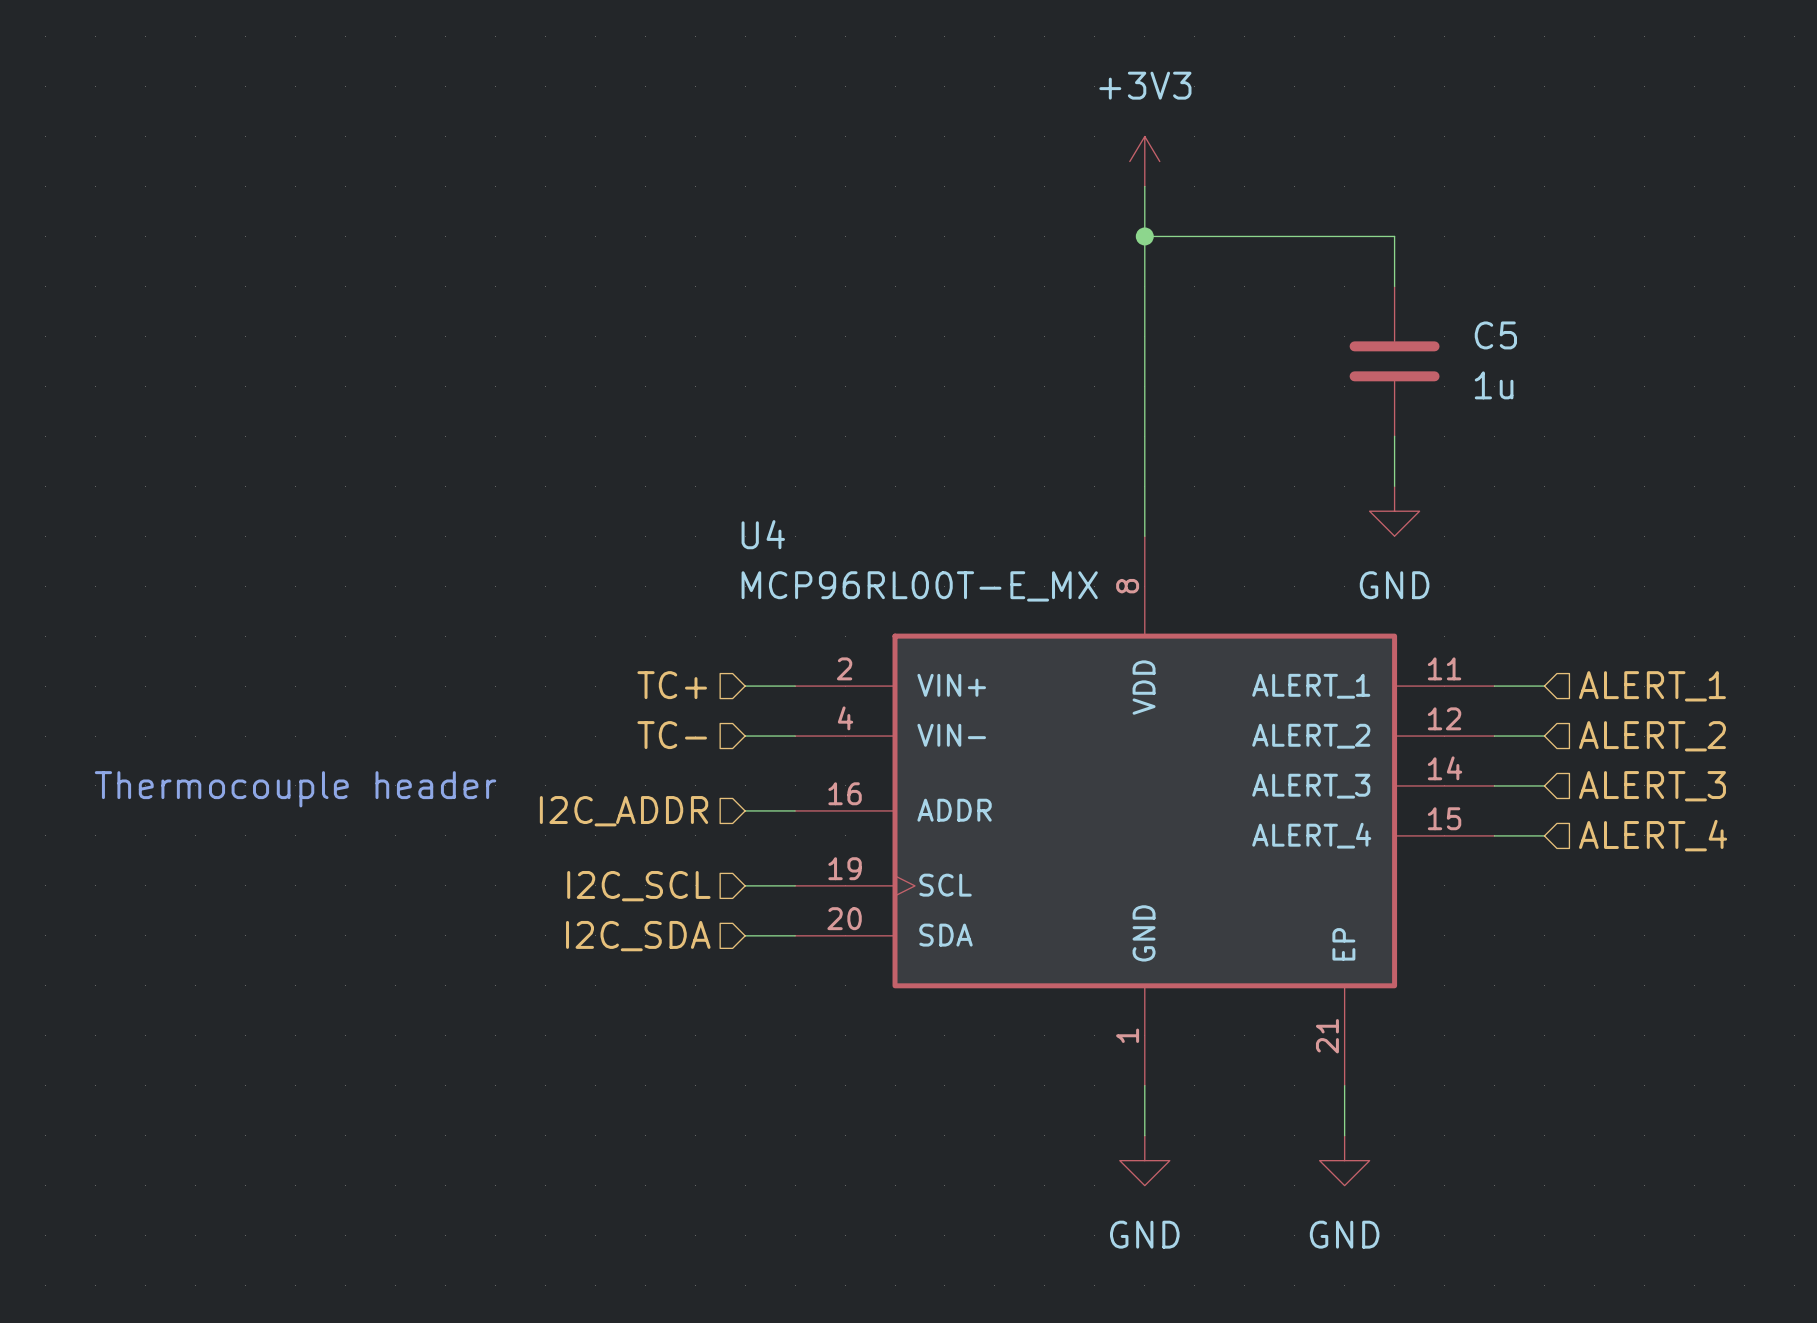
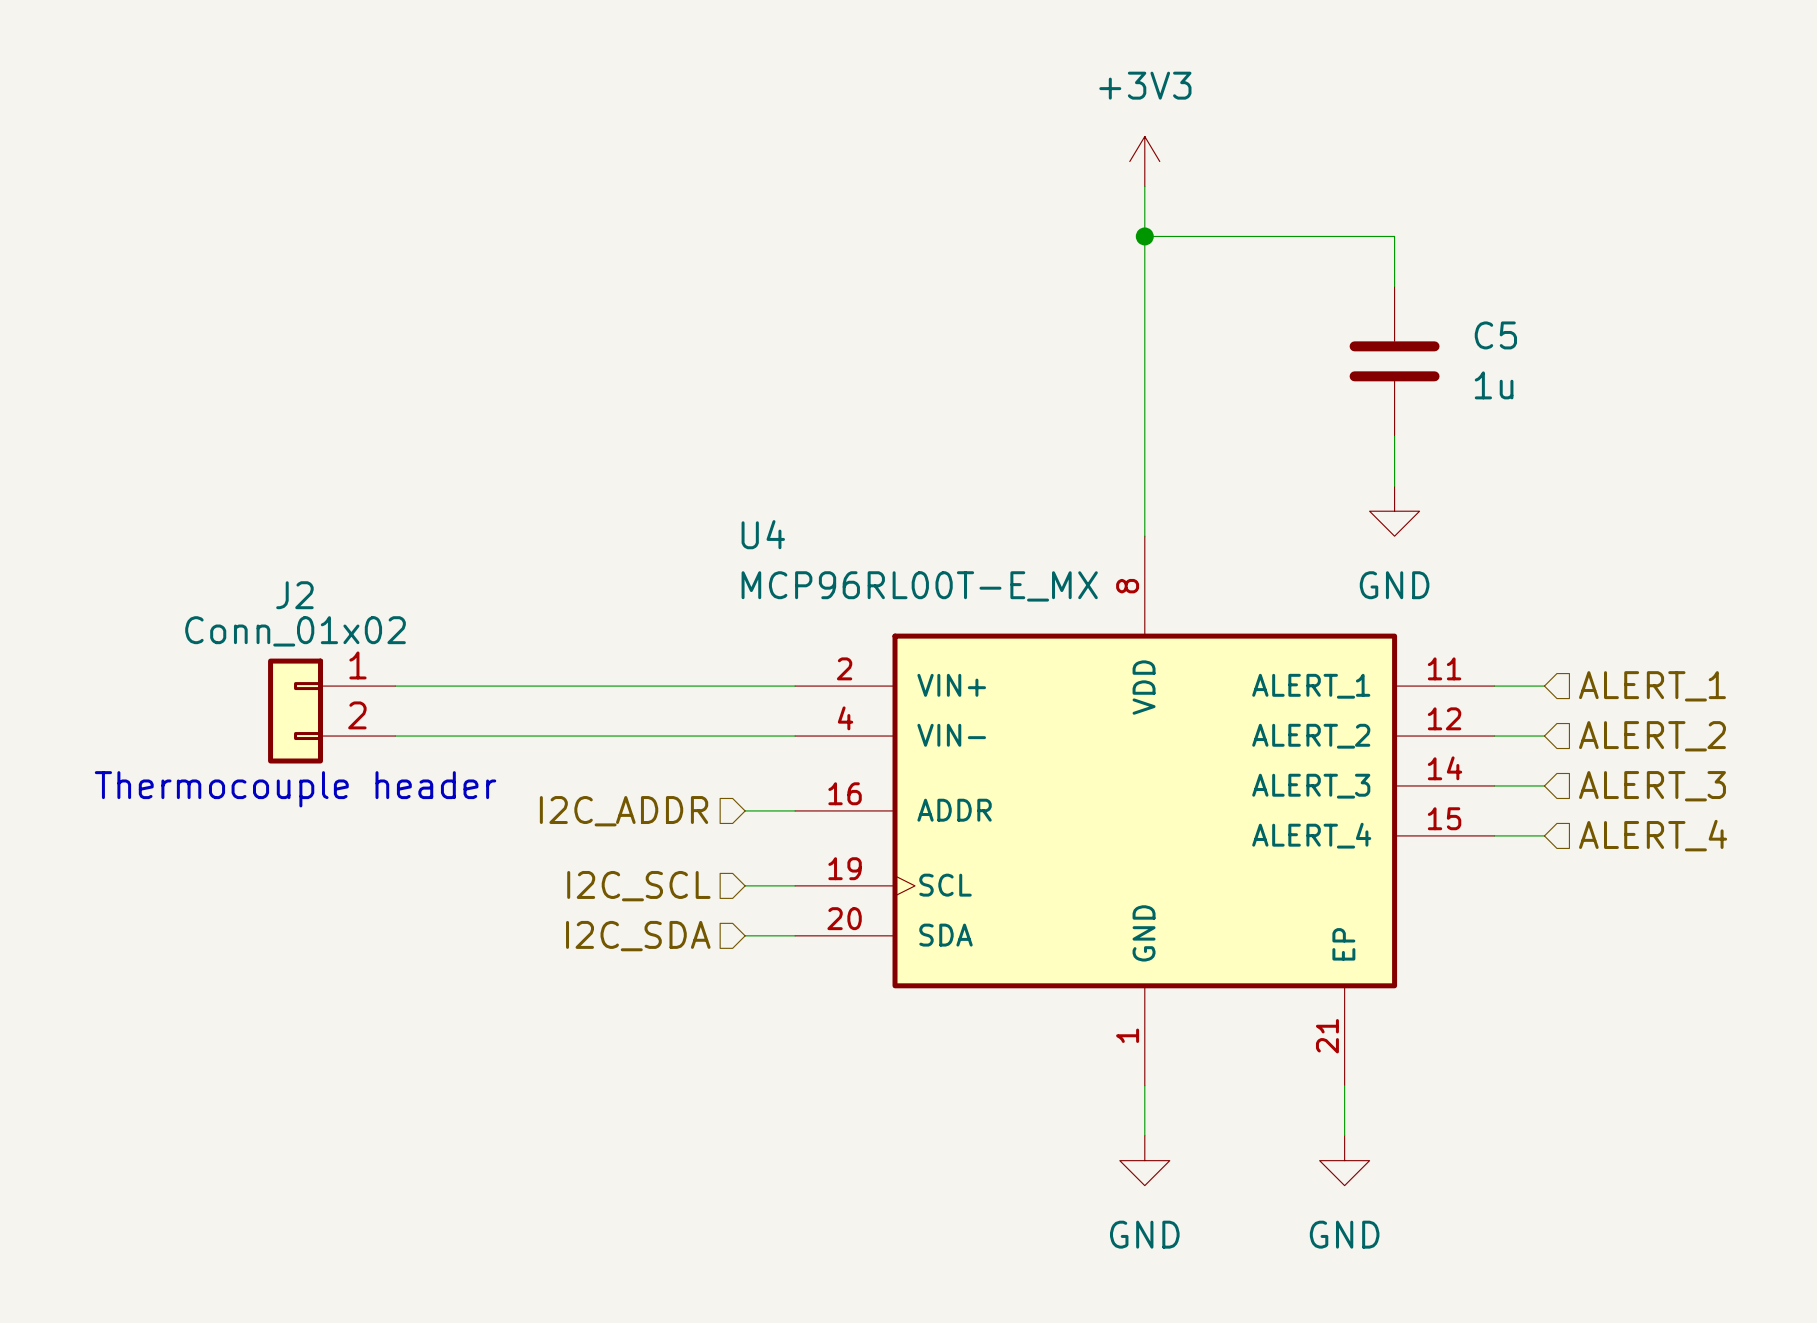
hierarchical label: TC+ (672, 685) -> none
wire: none -> (395, 686) (745, 686)
J2: none -> Conn_01x02 (331, 711)
hierarchical label: TC- (672, 735) -> none
wire: none -> (395, 736) (745, 736)

